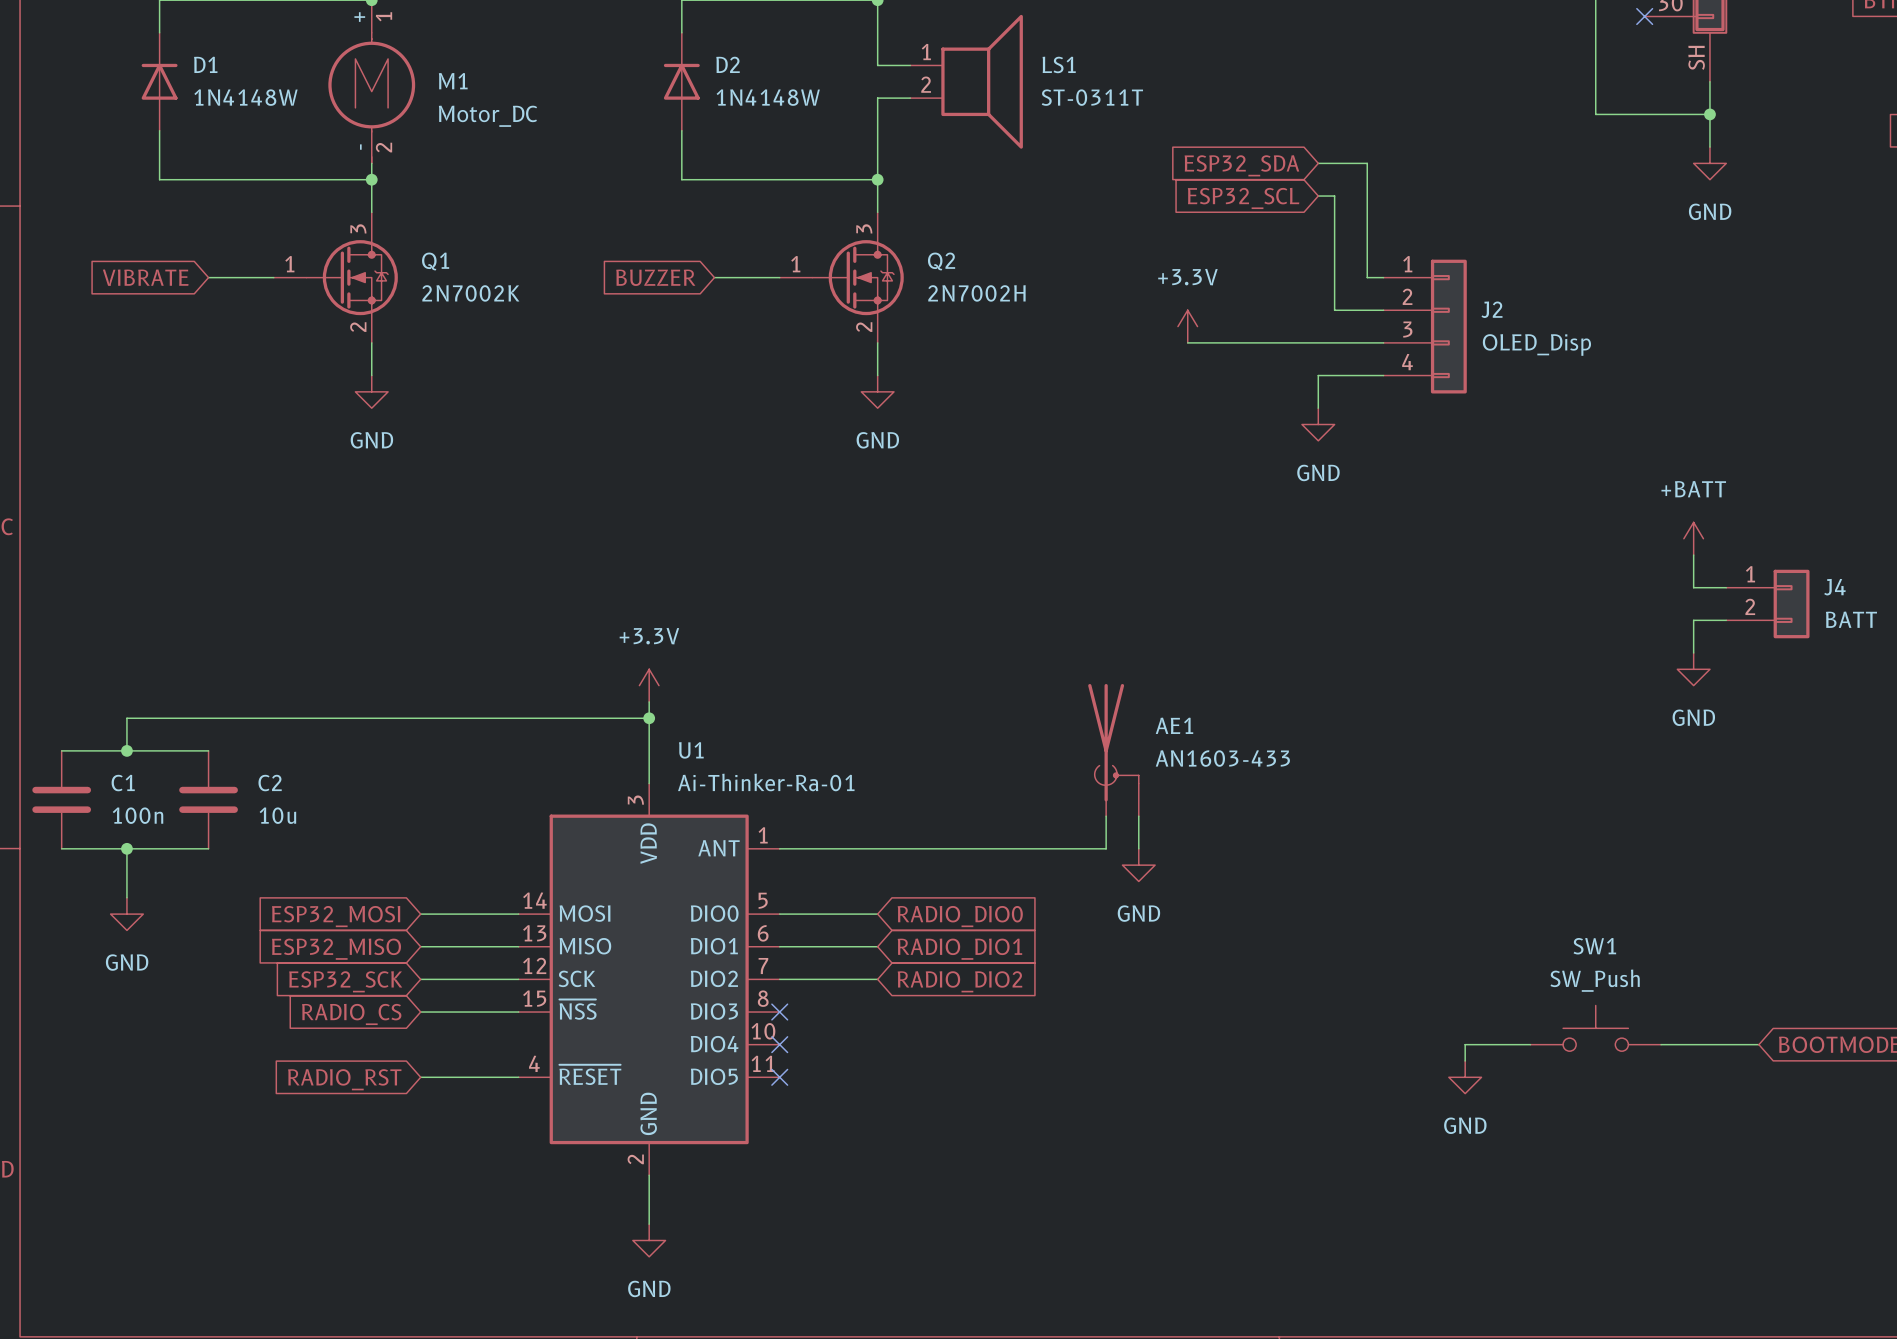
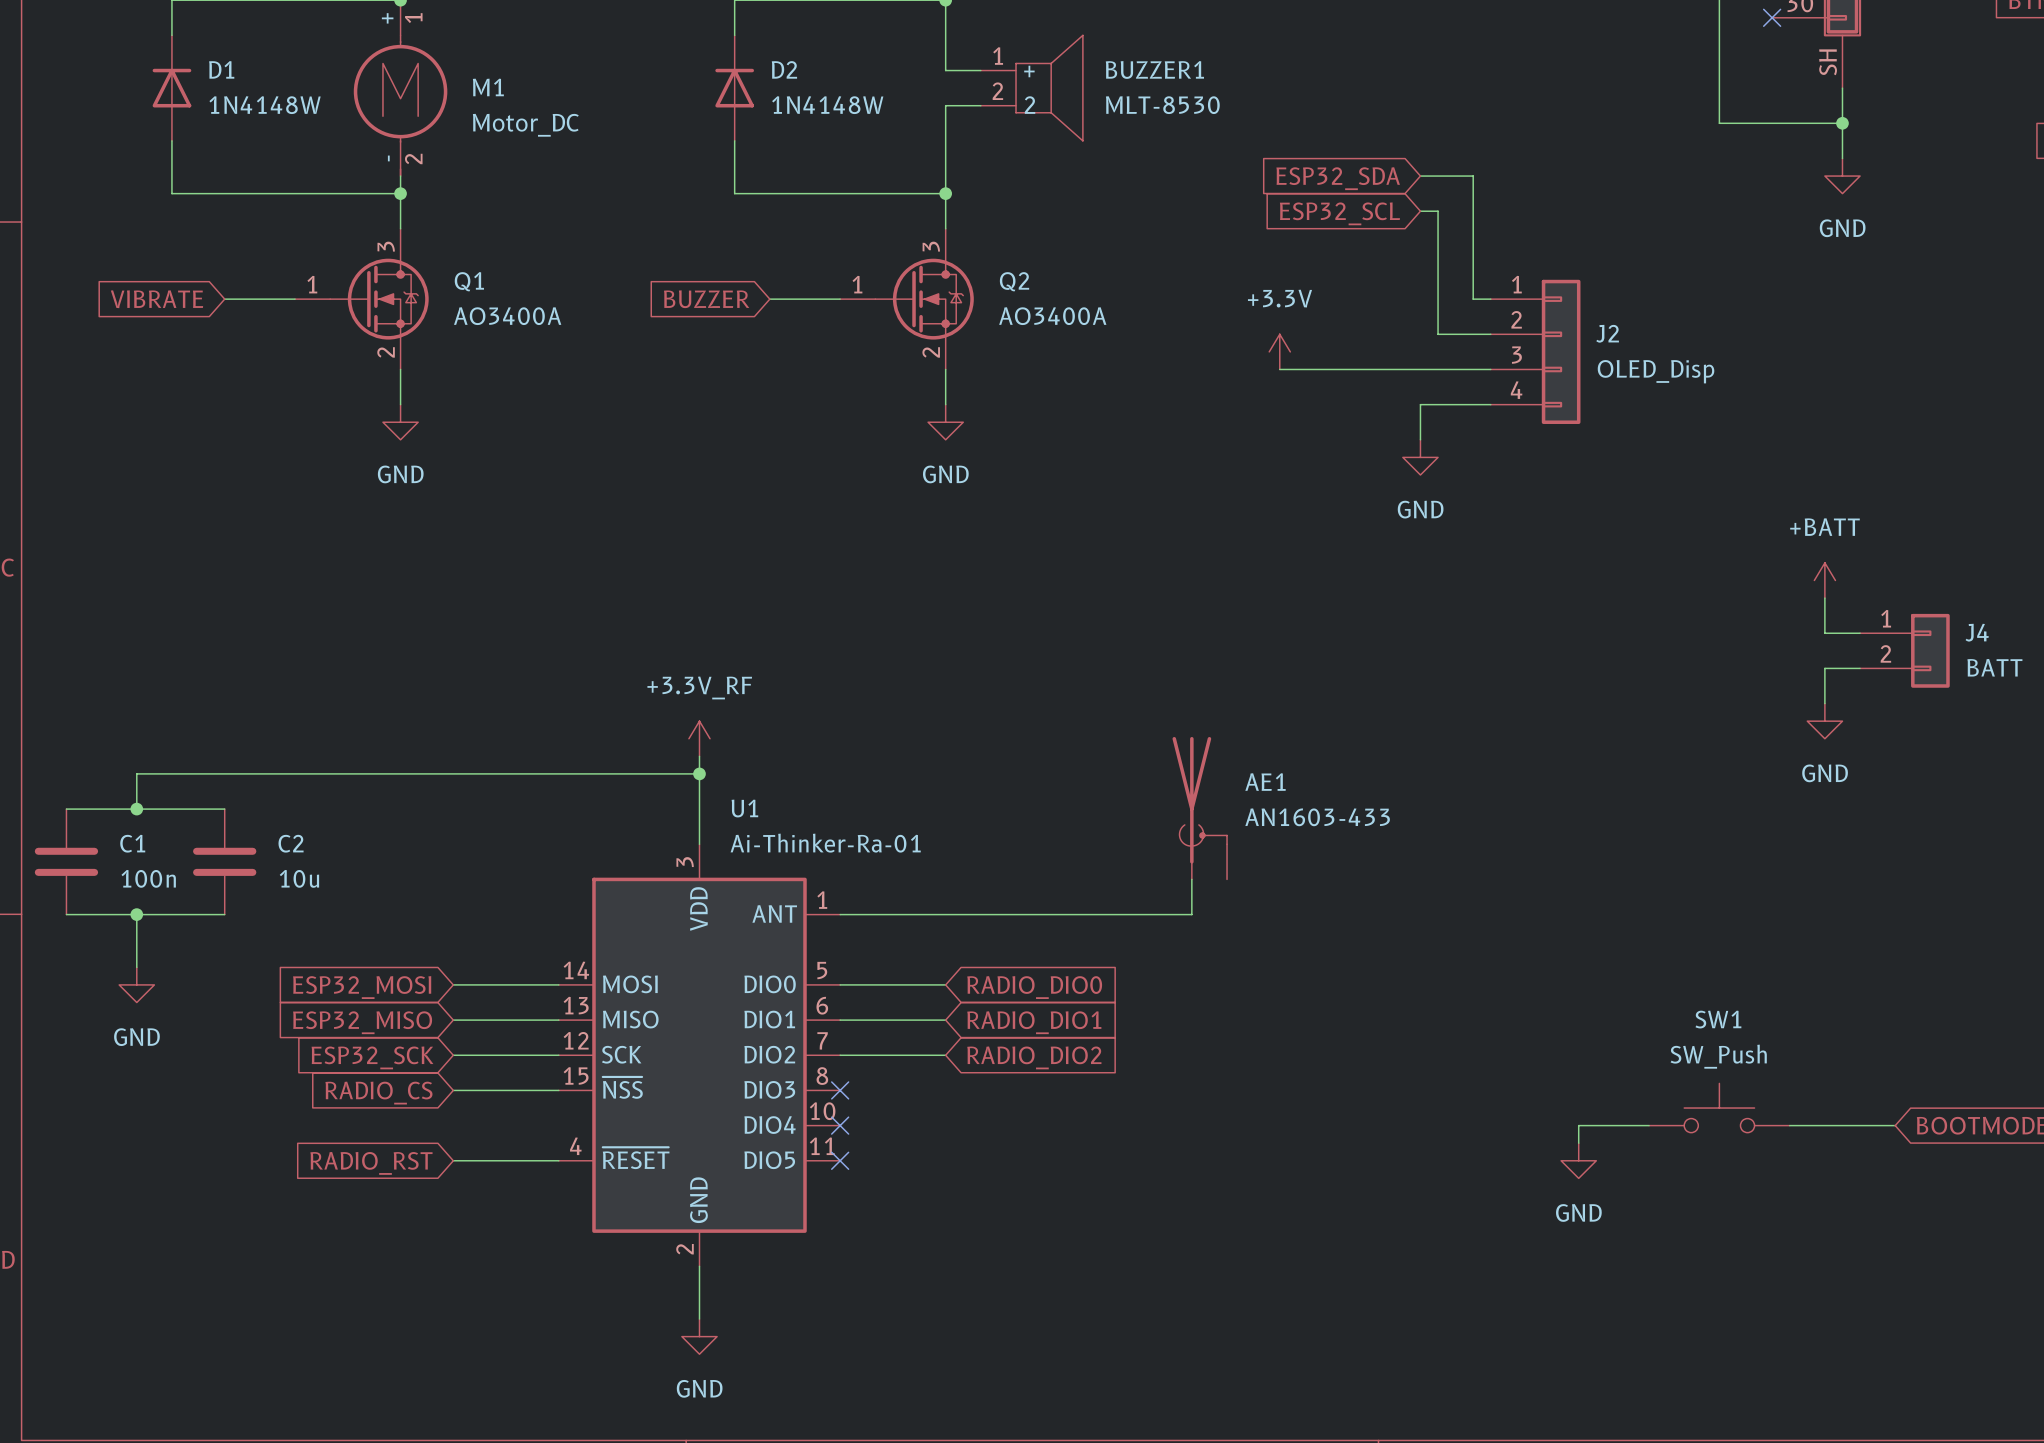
BUZZER1: none -> MLT-8530 (1031, 88)
LS1: ST-0311T (966, 81) -> none
Q1 value: 2N7002K (470, 293) -> AO3400A (507, 316)
Q2 value: 2N7002H (976, 293) -> AO3400A (1052, 316)
power symbol: +3.3V (649, 685) -> +3.3V_RF (699, 738)
wire: (1138, 816) (1138, 848) -> none
power symbol: GND (1138, 865) -> none

